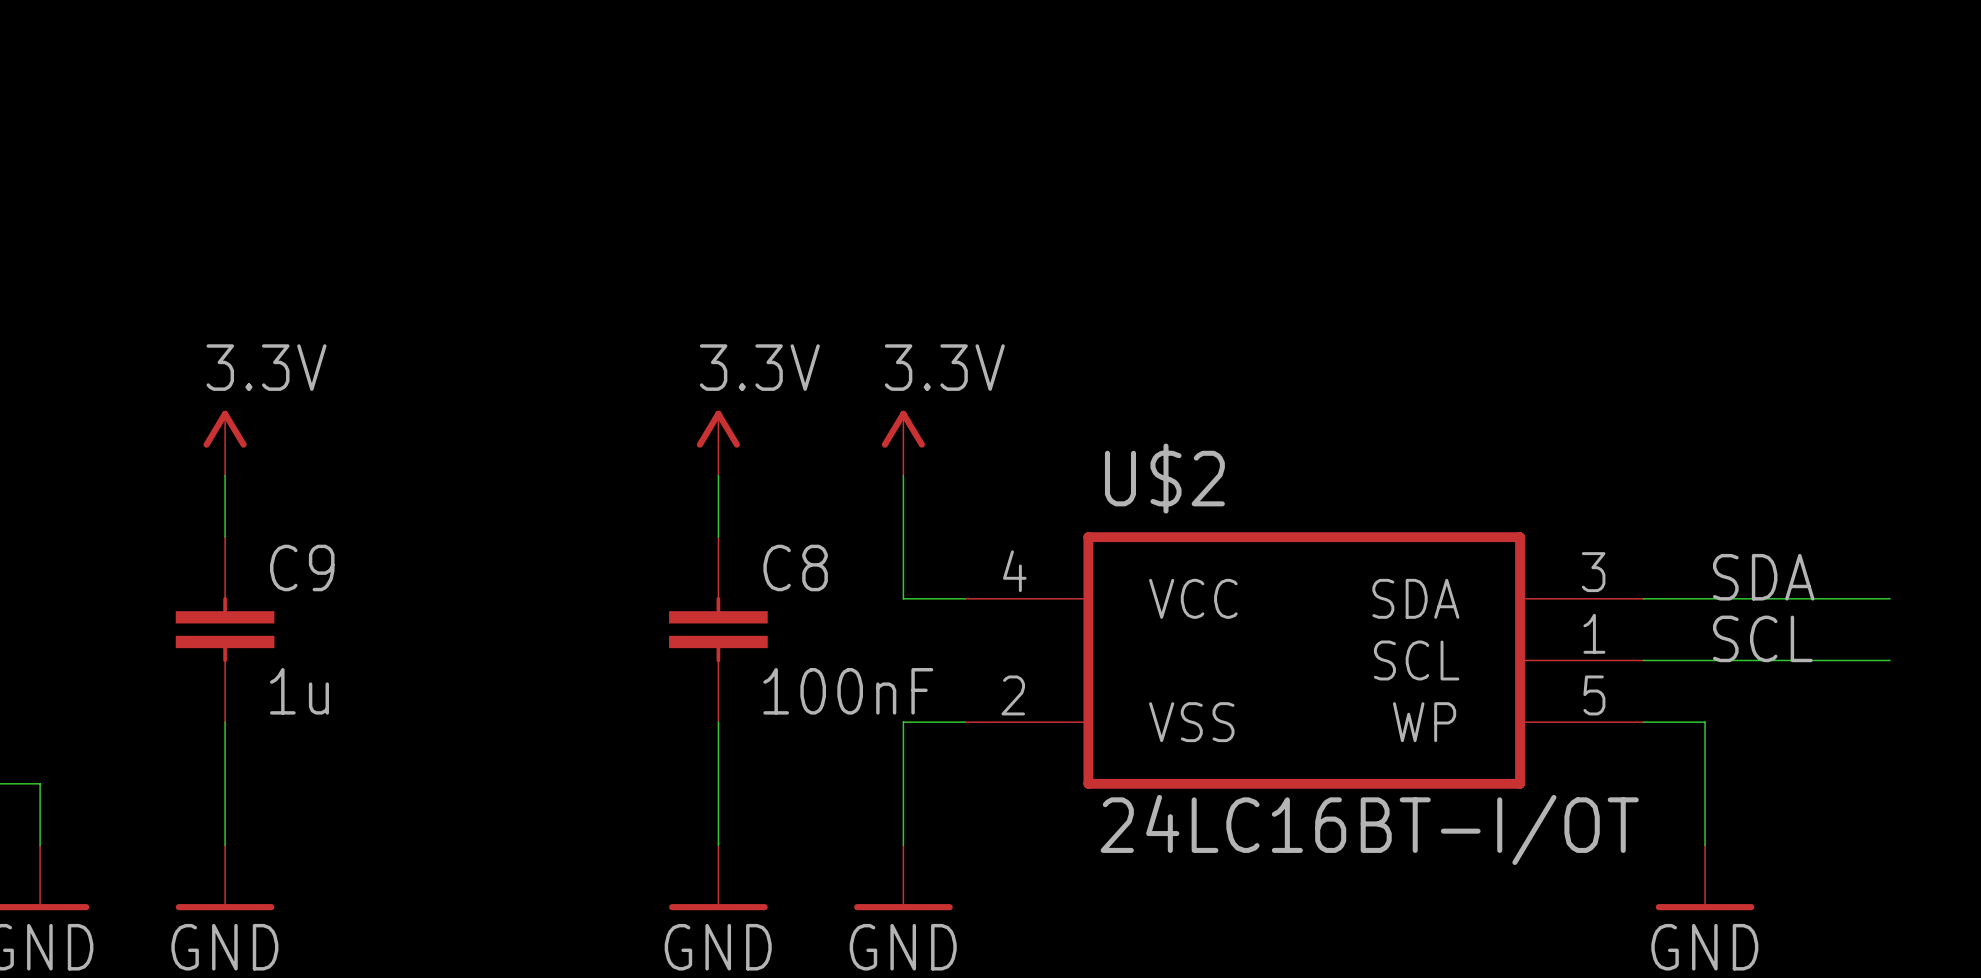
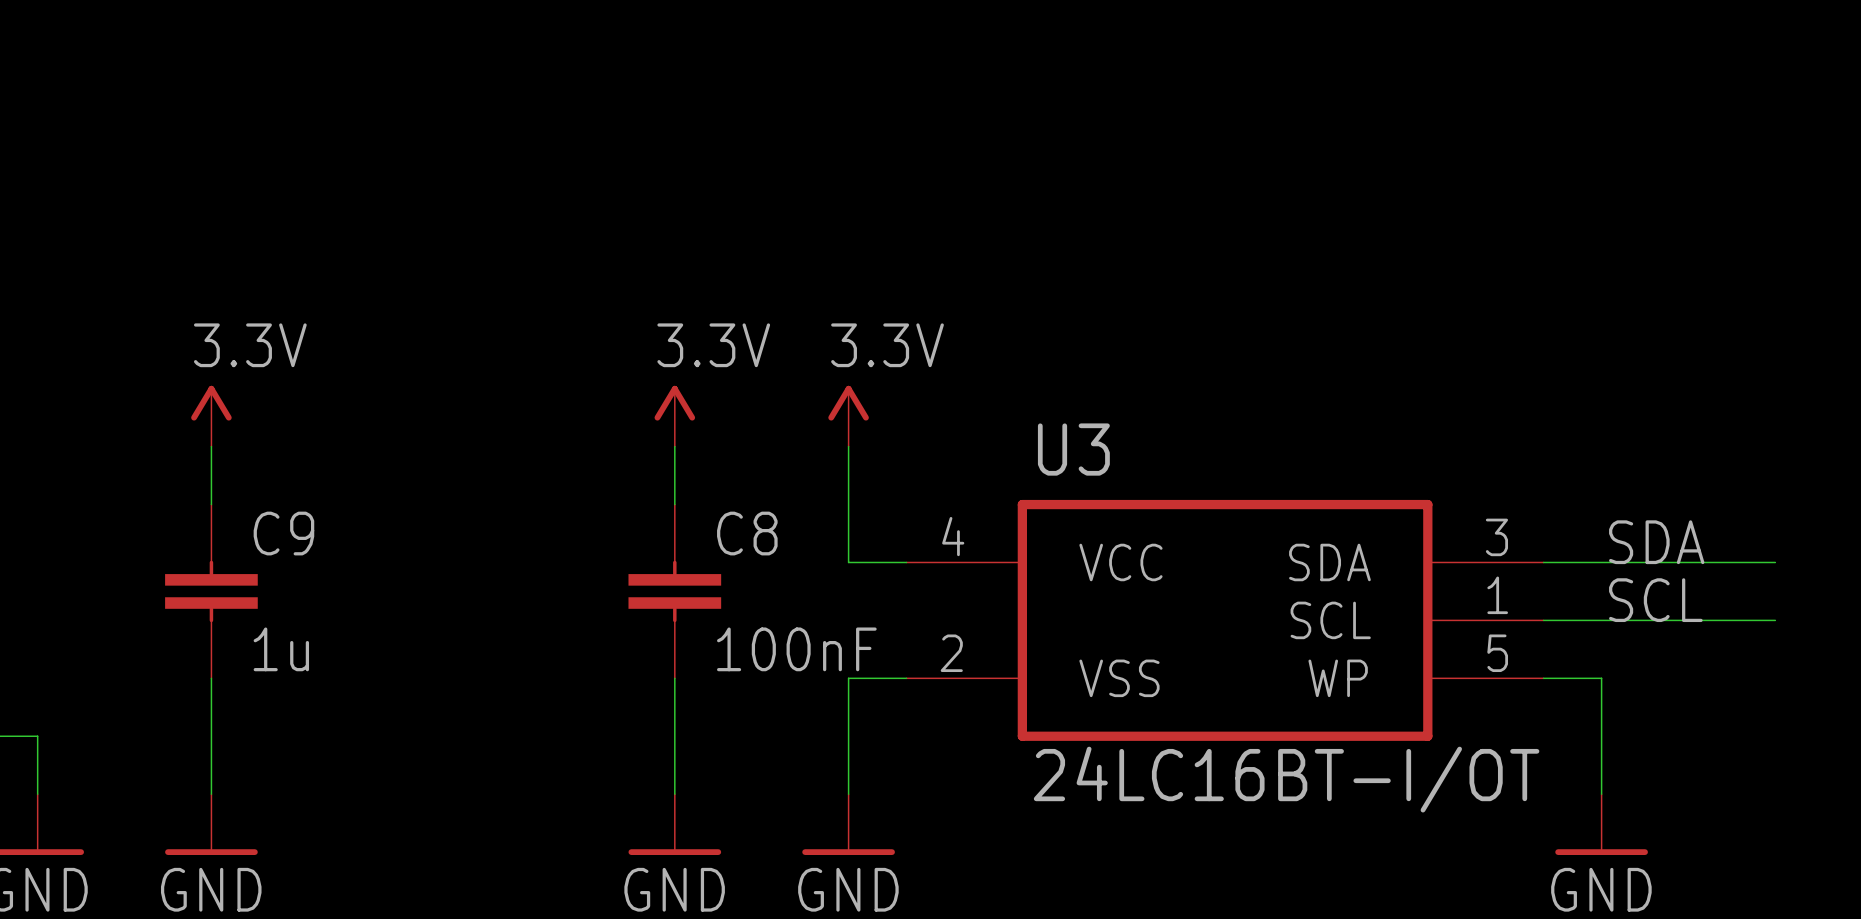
U$2 name: U$2 (1164, 478) -> U3 (1073, 449)

